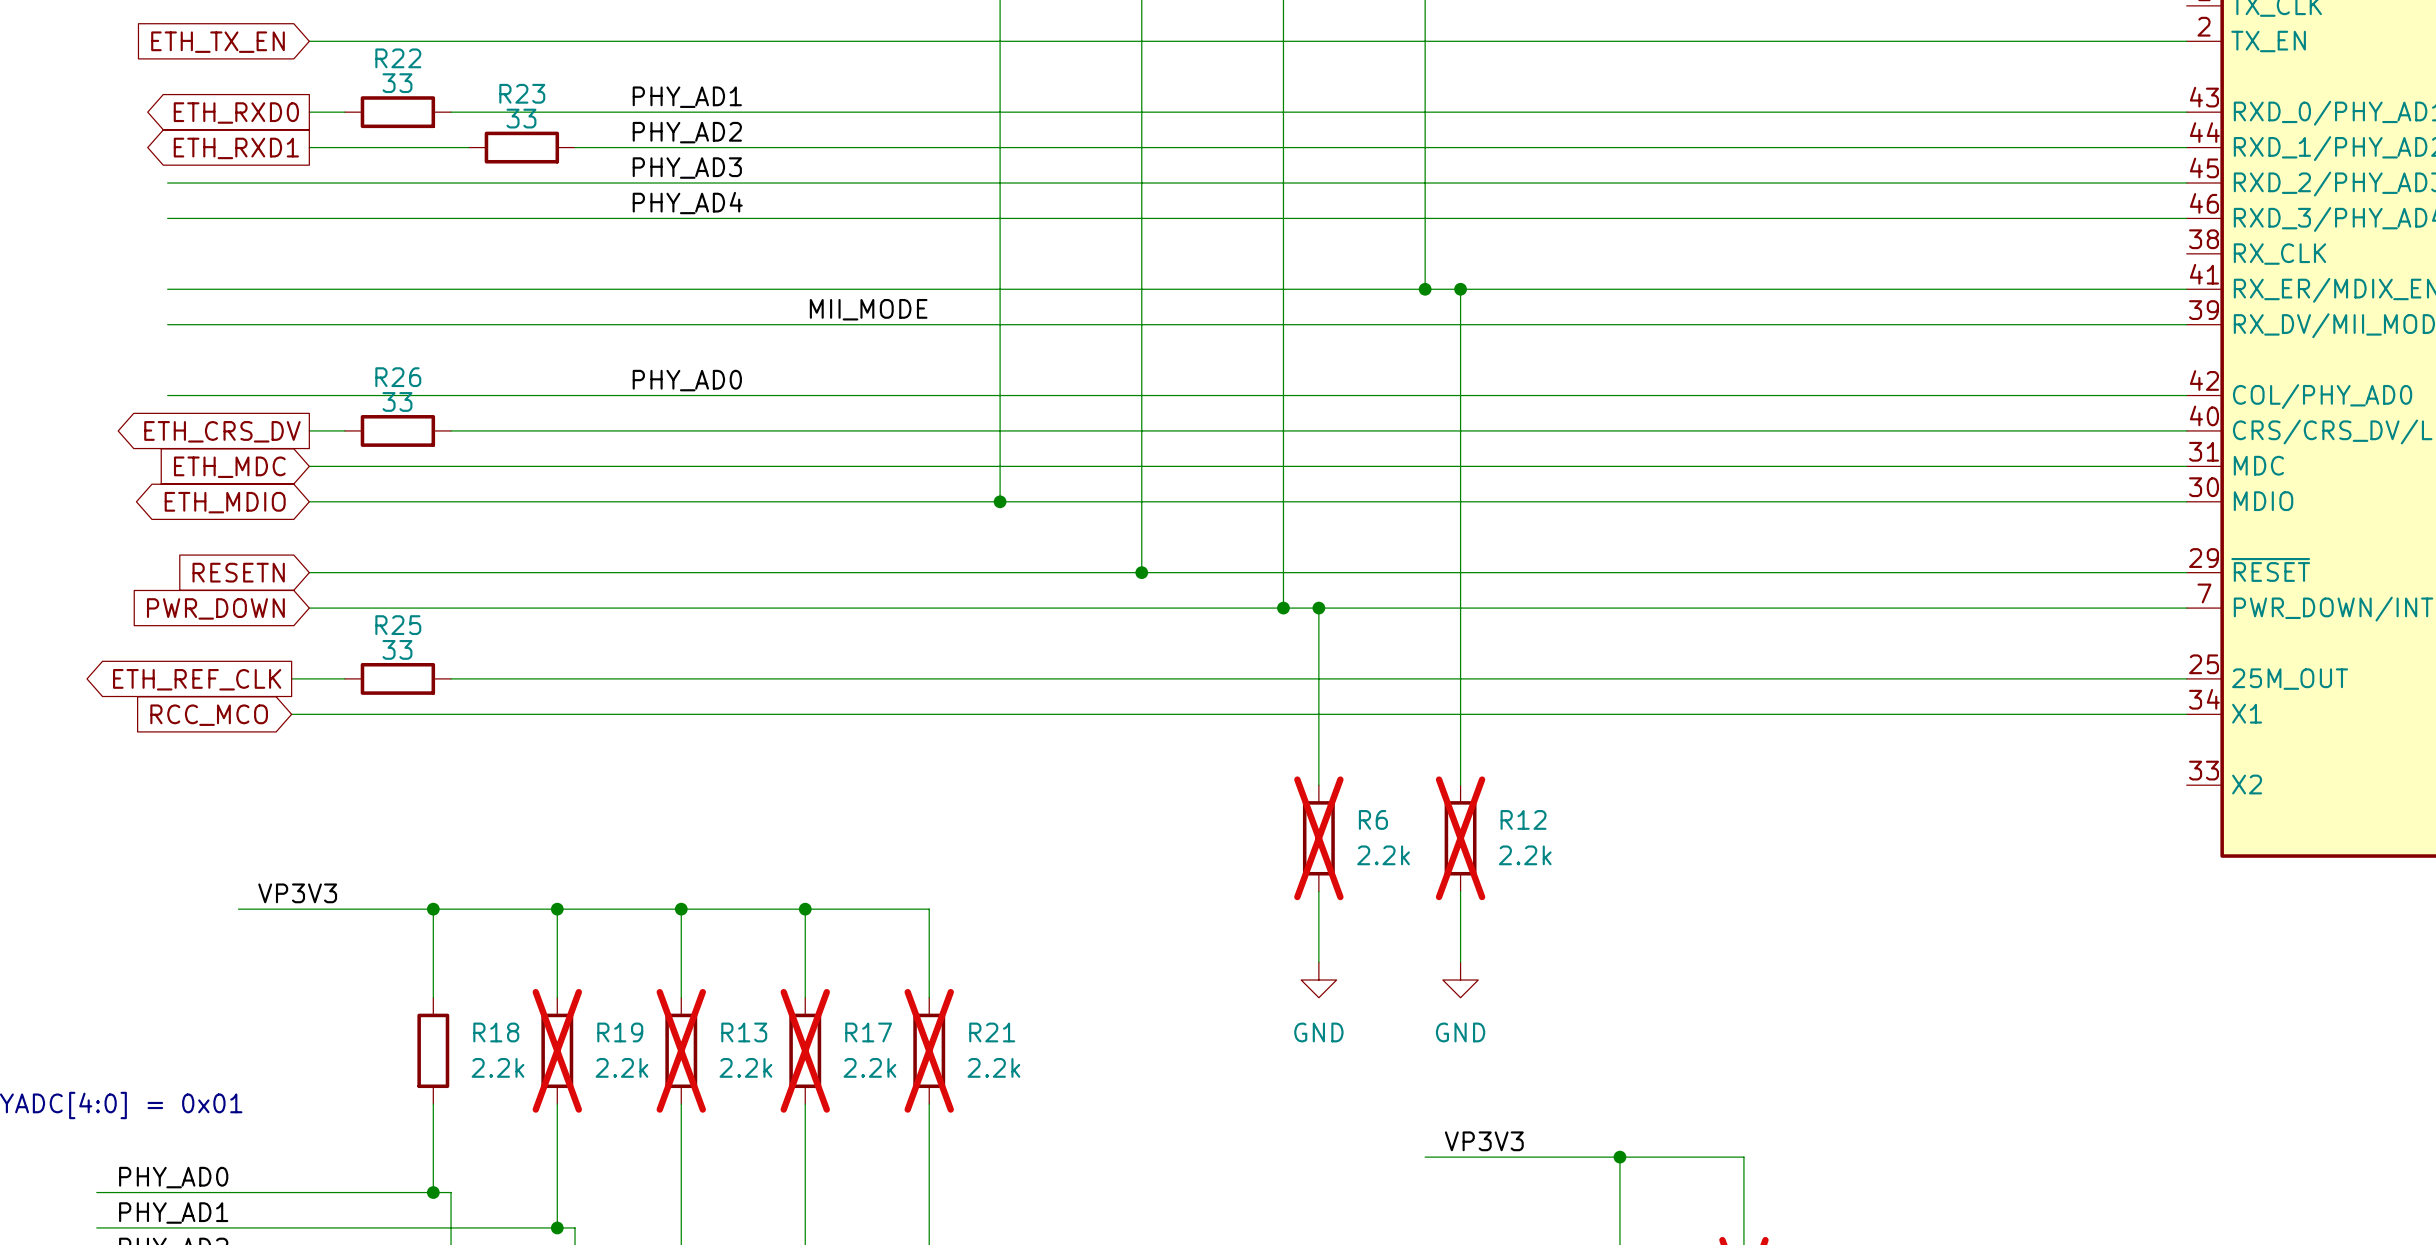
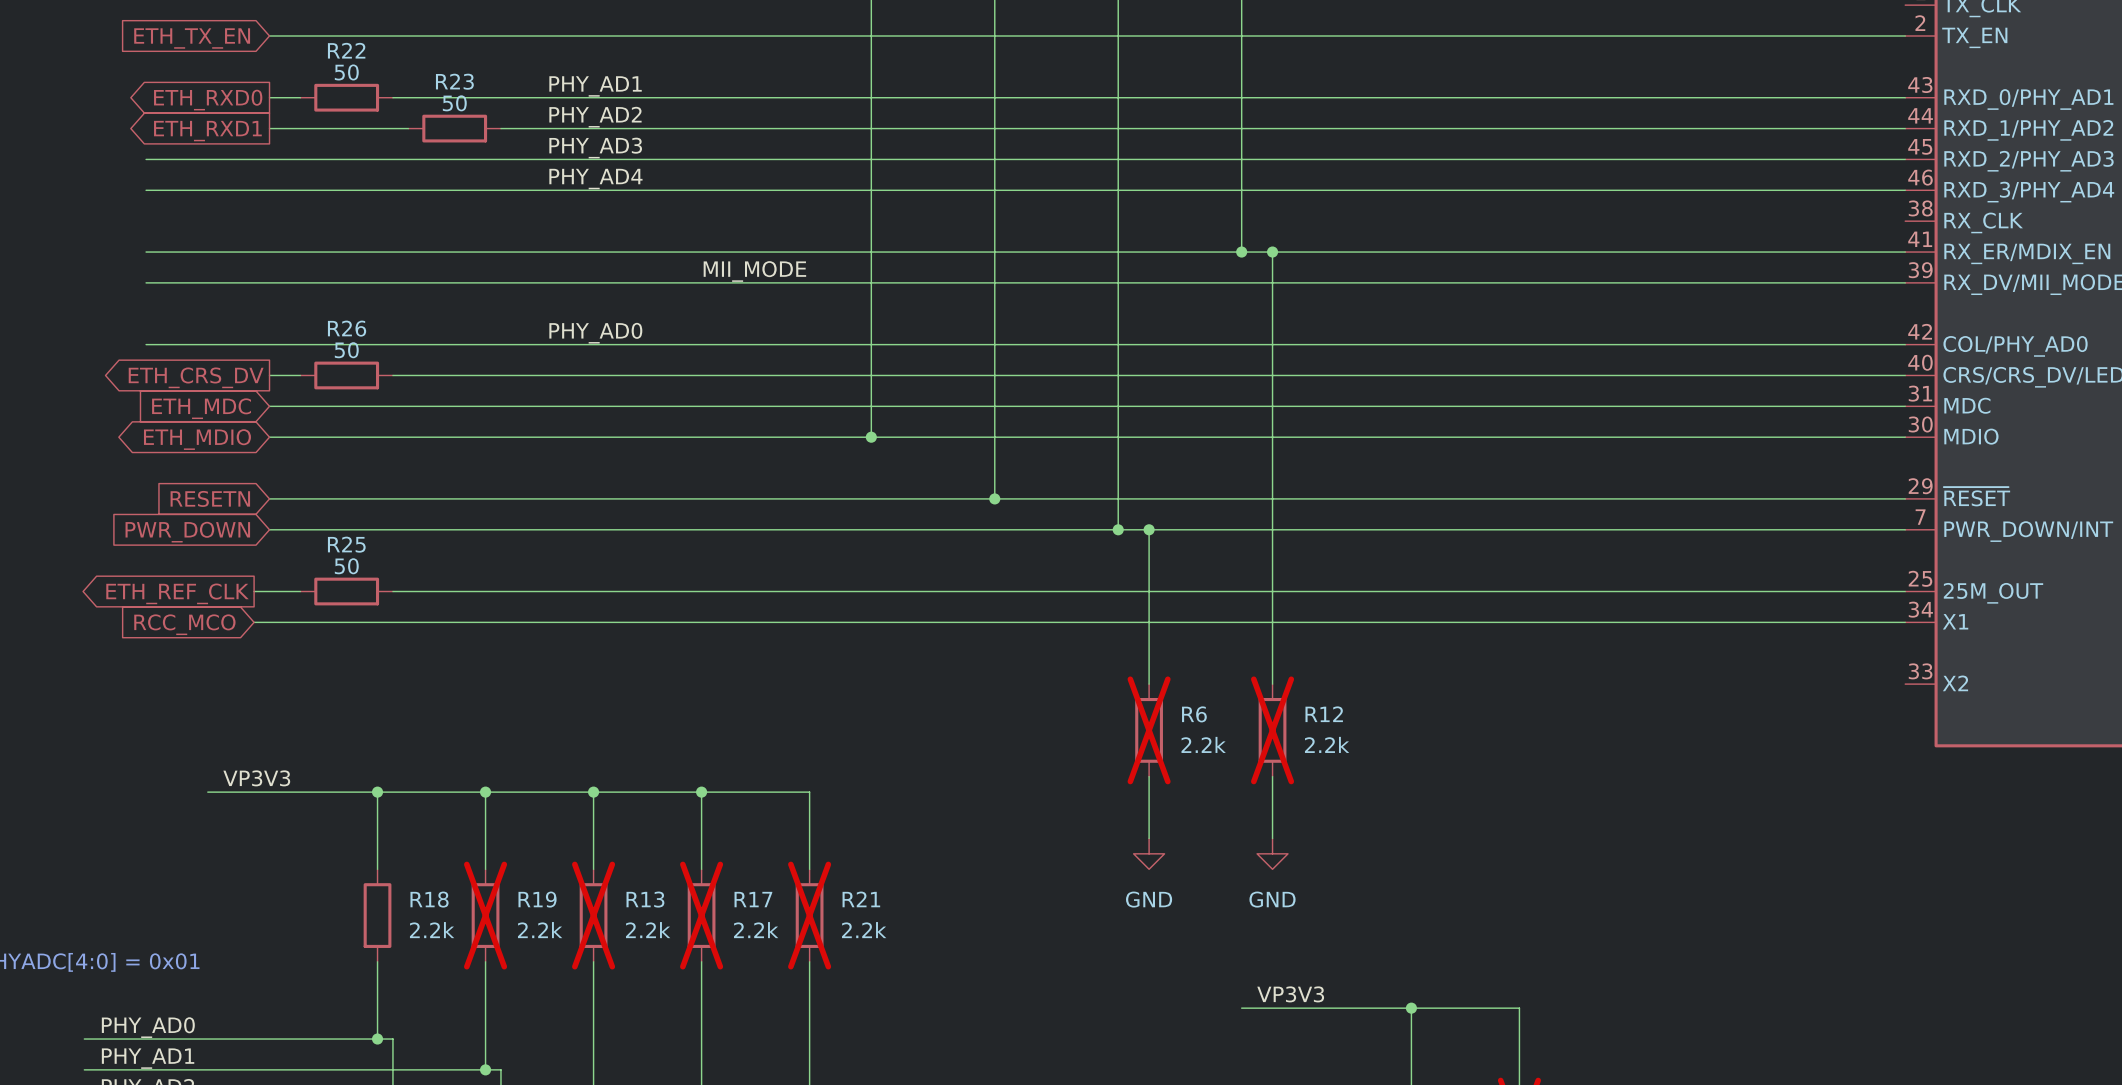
R22 value: 33 (397, 83) -> 50 (346, 72)
R23 value: 33 (521, 118) -> 50 (454, 103)
R26 value: 33 (397, 401) -> 50 (346, 350)
R25 value: 33 (397, 649) -> 50 (346, 566)

